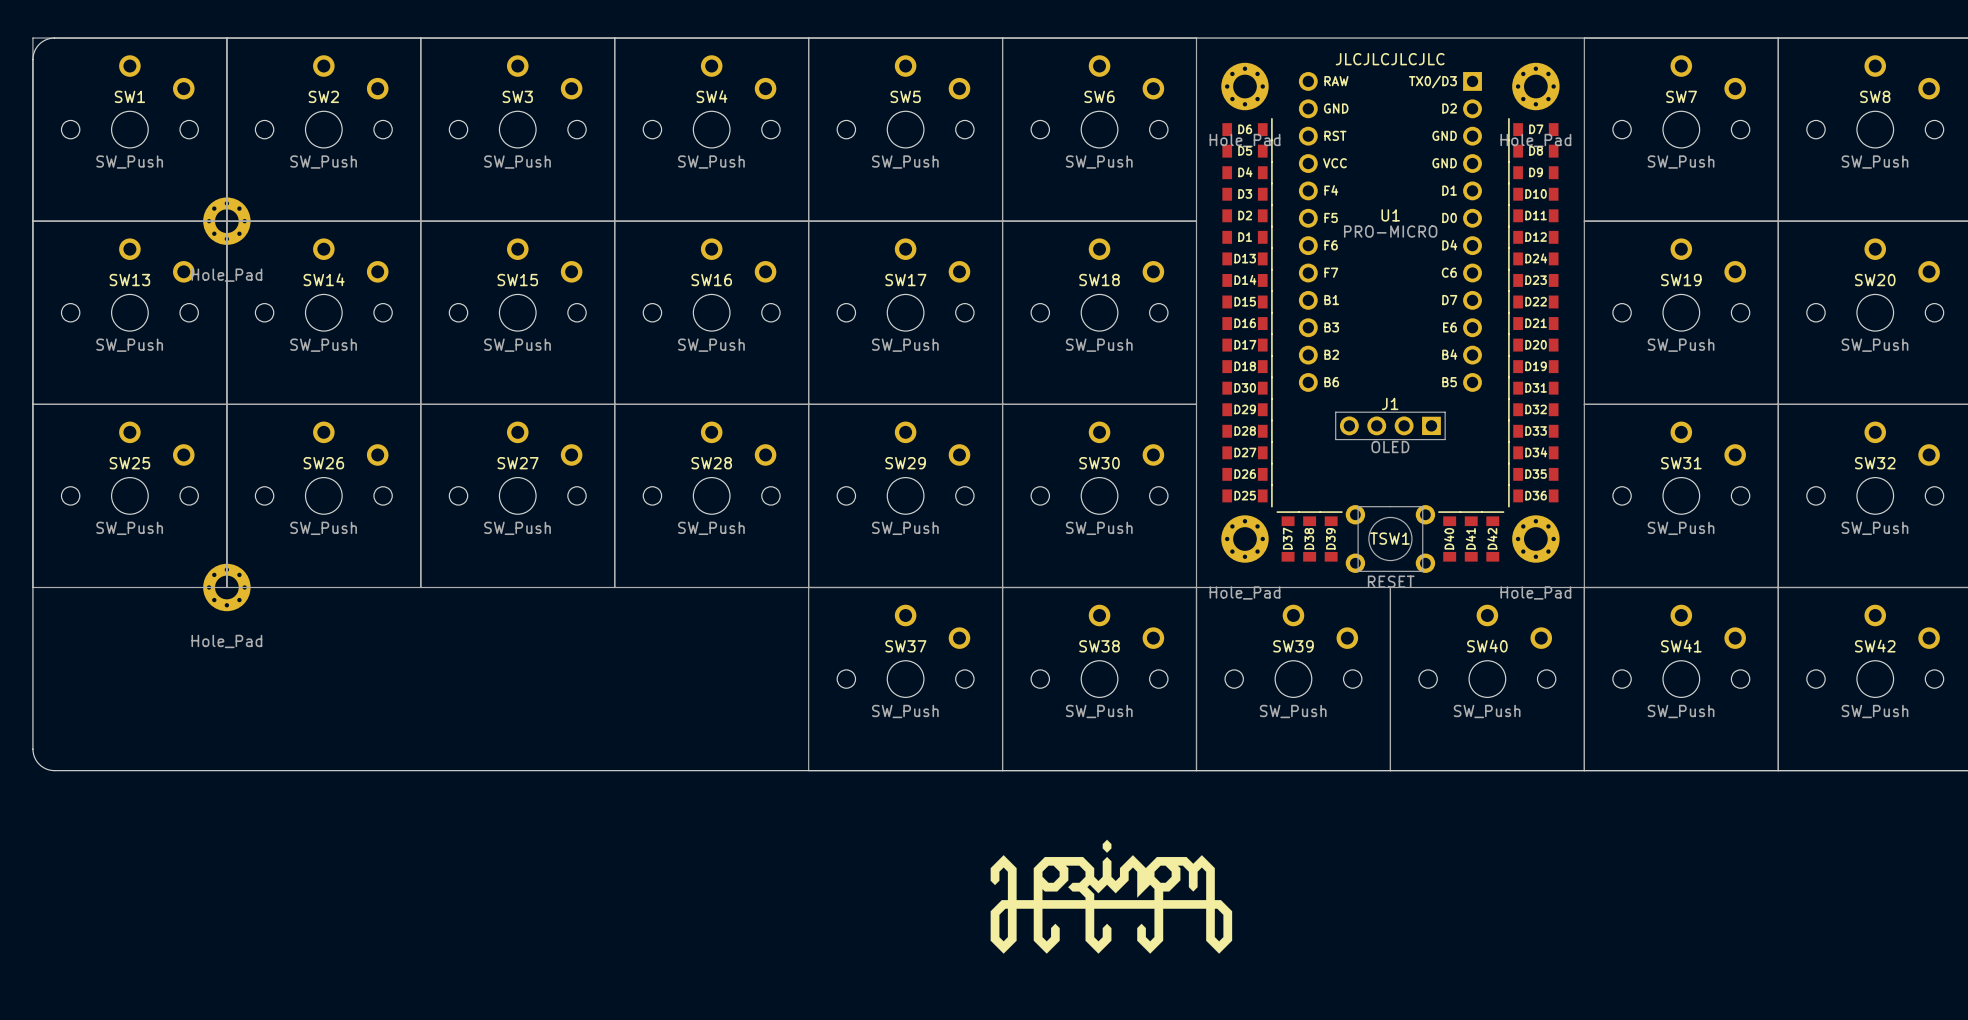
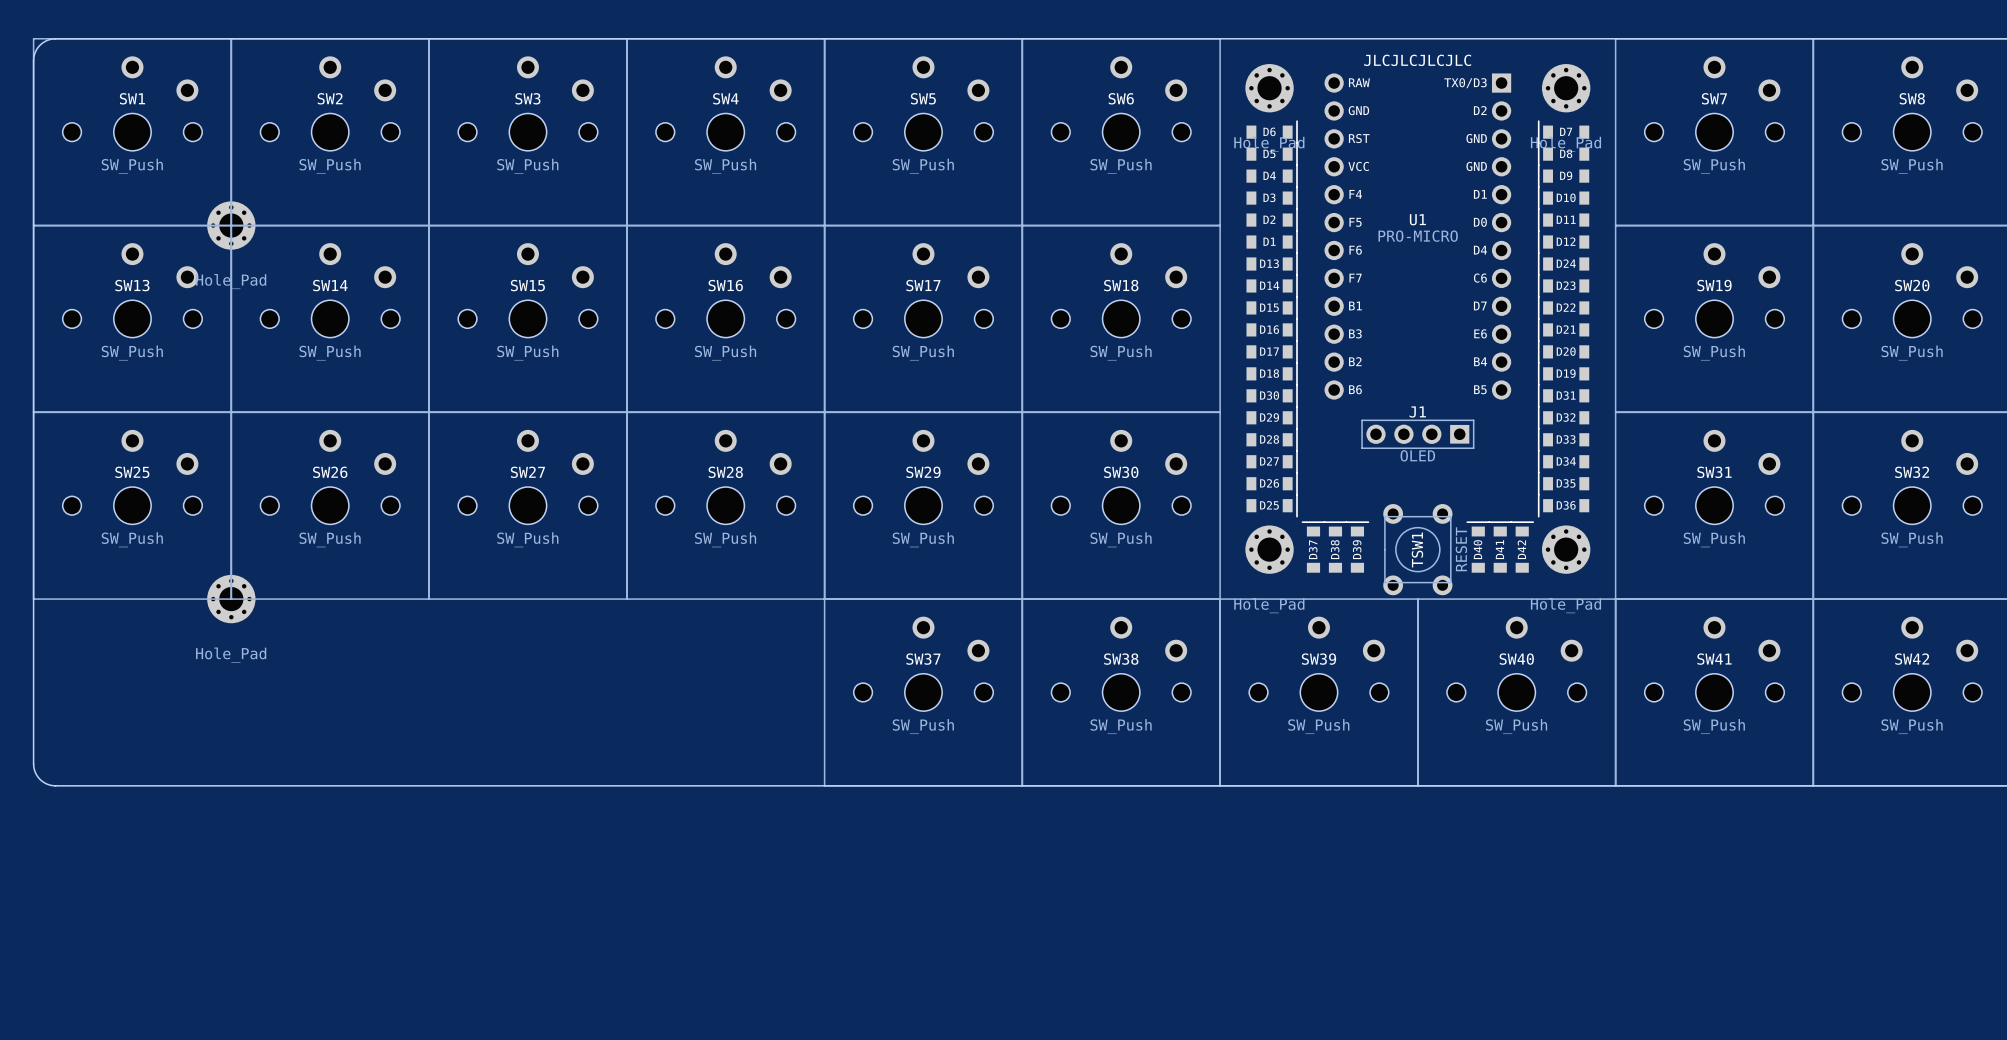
TSW1 rotation: 0° (1390, 539) -> 90° counterclockwise (1417, 549)
drawing: [990, 839, 1233, 954] -> none

